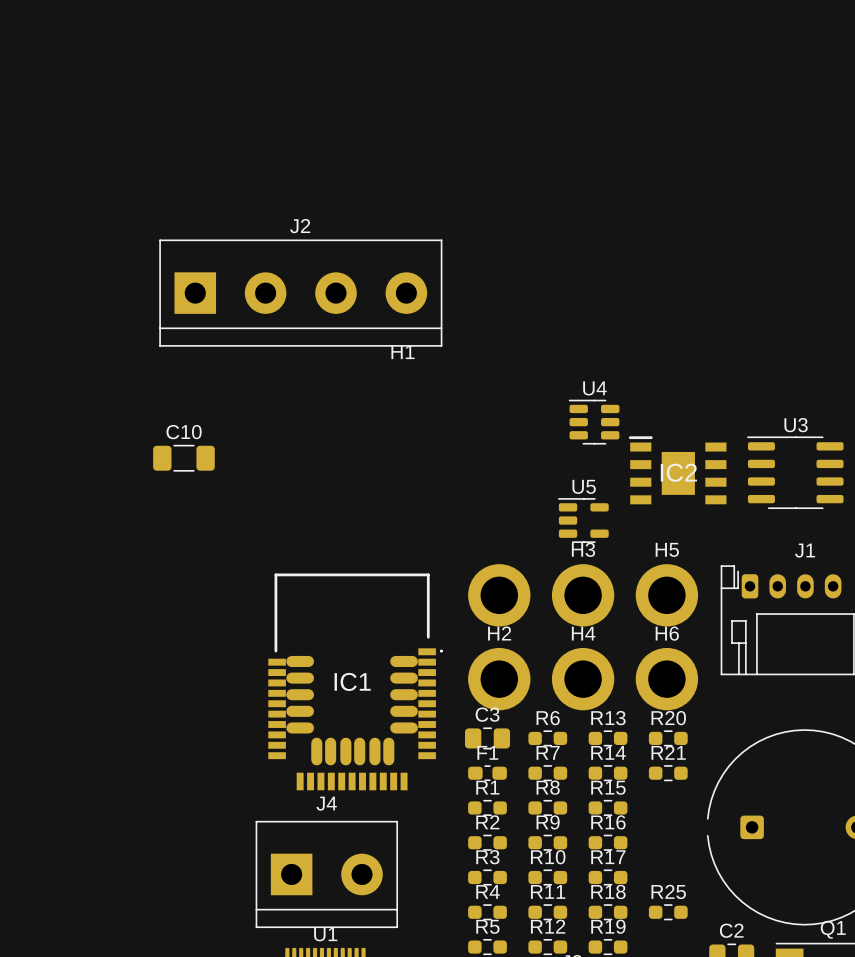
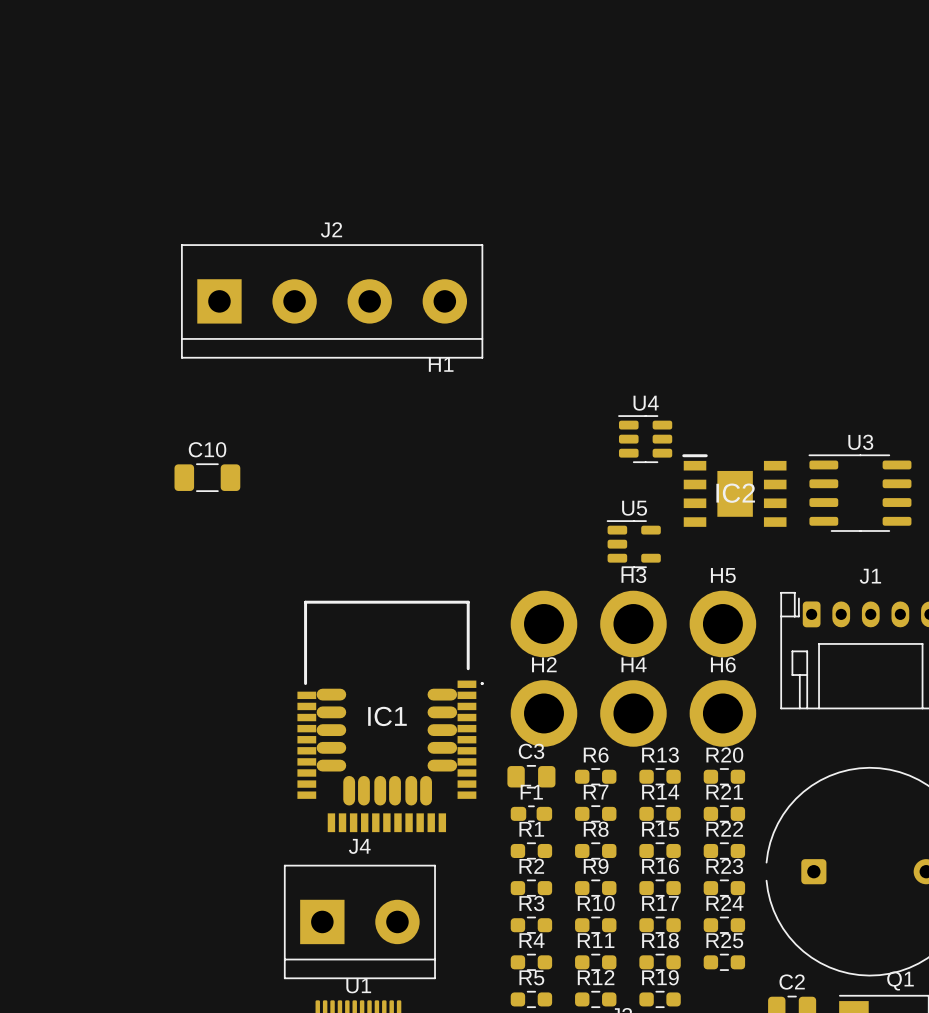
R22: none -> (724, 850)
R23: none -> (724, 888)
R24: none -> (724, 925)

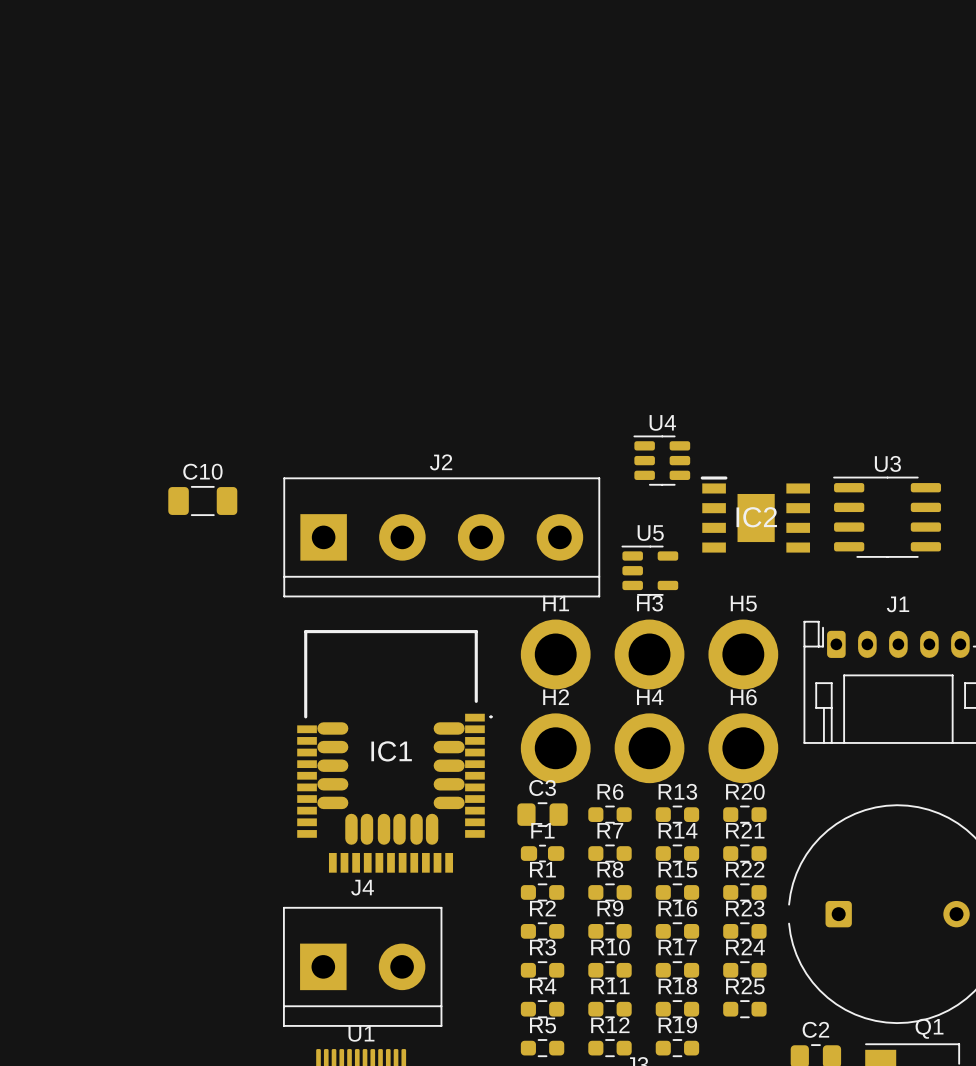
J2 position: (332, 301) -> (441, 537)
H1 name position: H1 (441, 364) -> H1 (556, 603)

